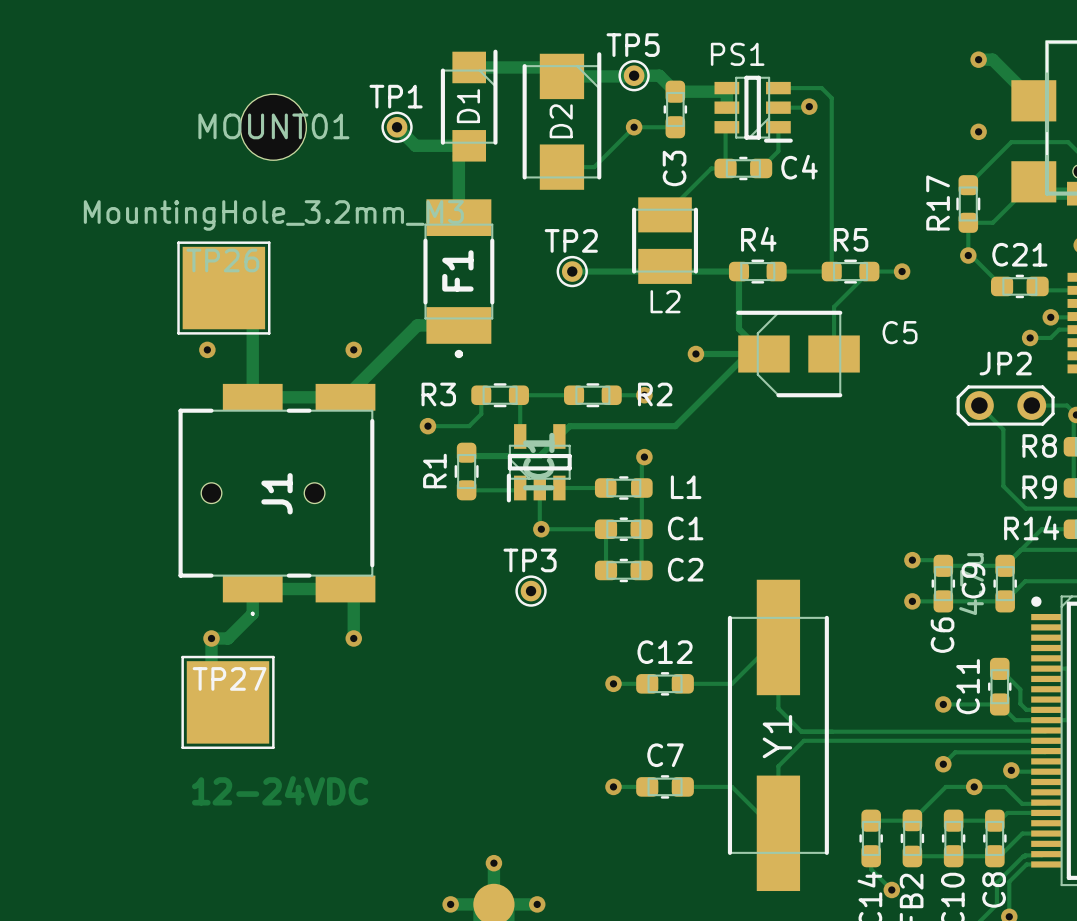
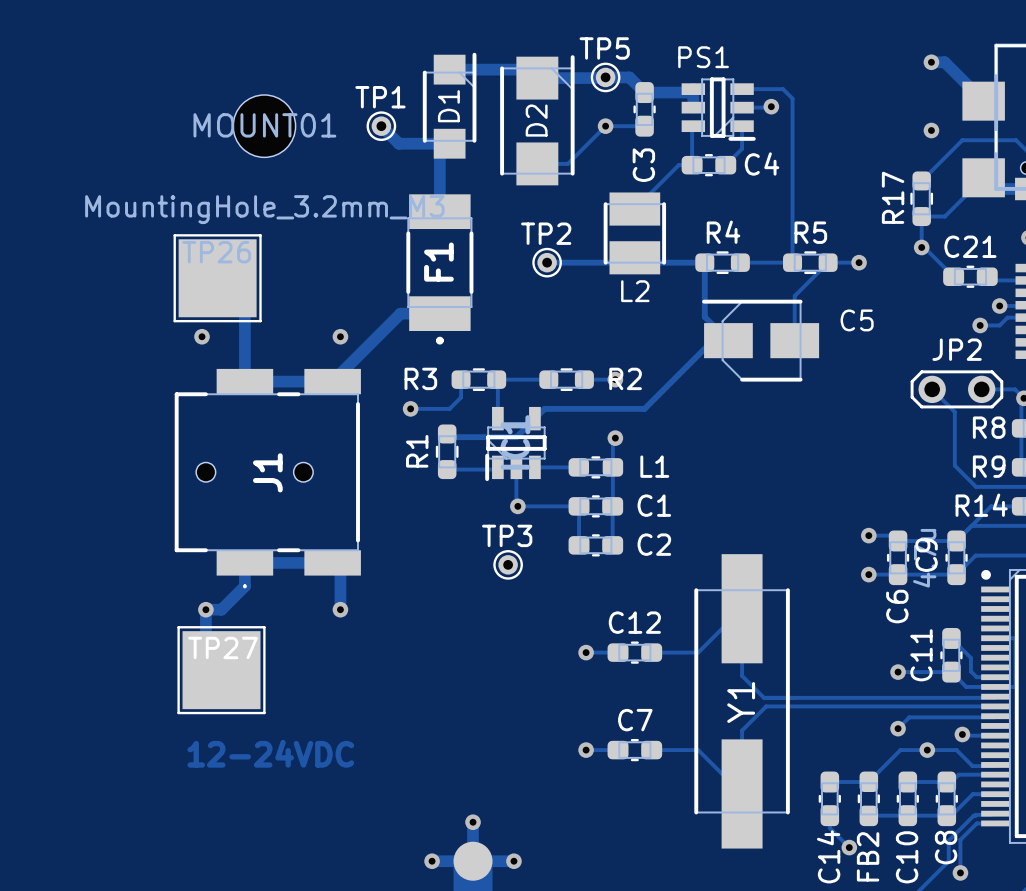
track: (695, 354) (747, 354) -> none
via: (695, 354) -> none

